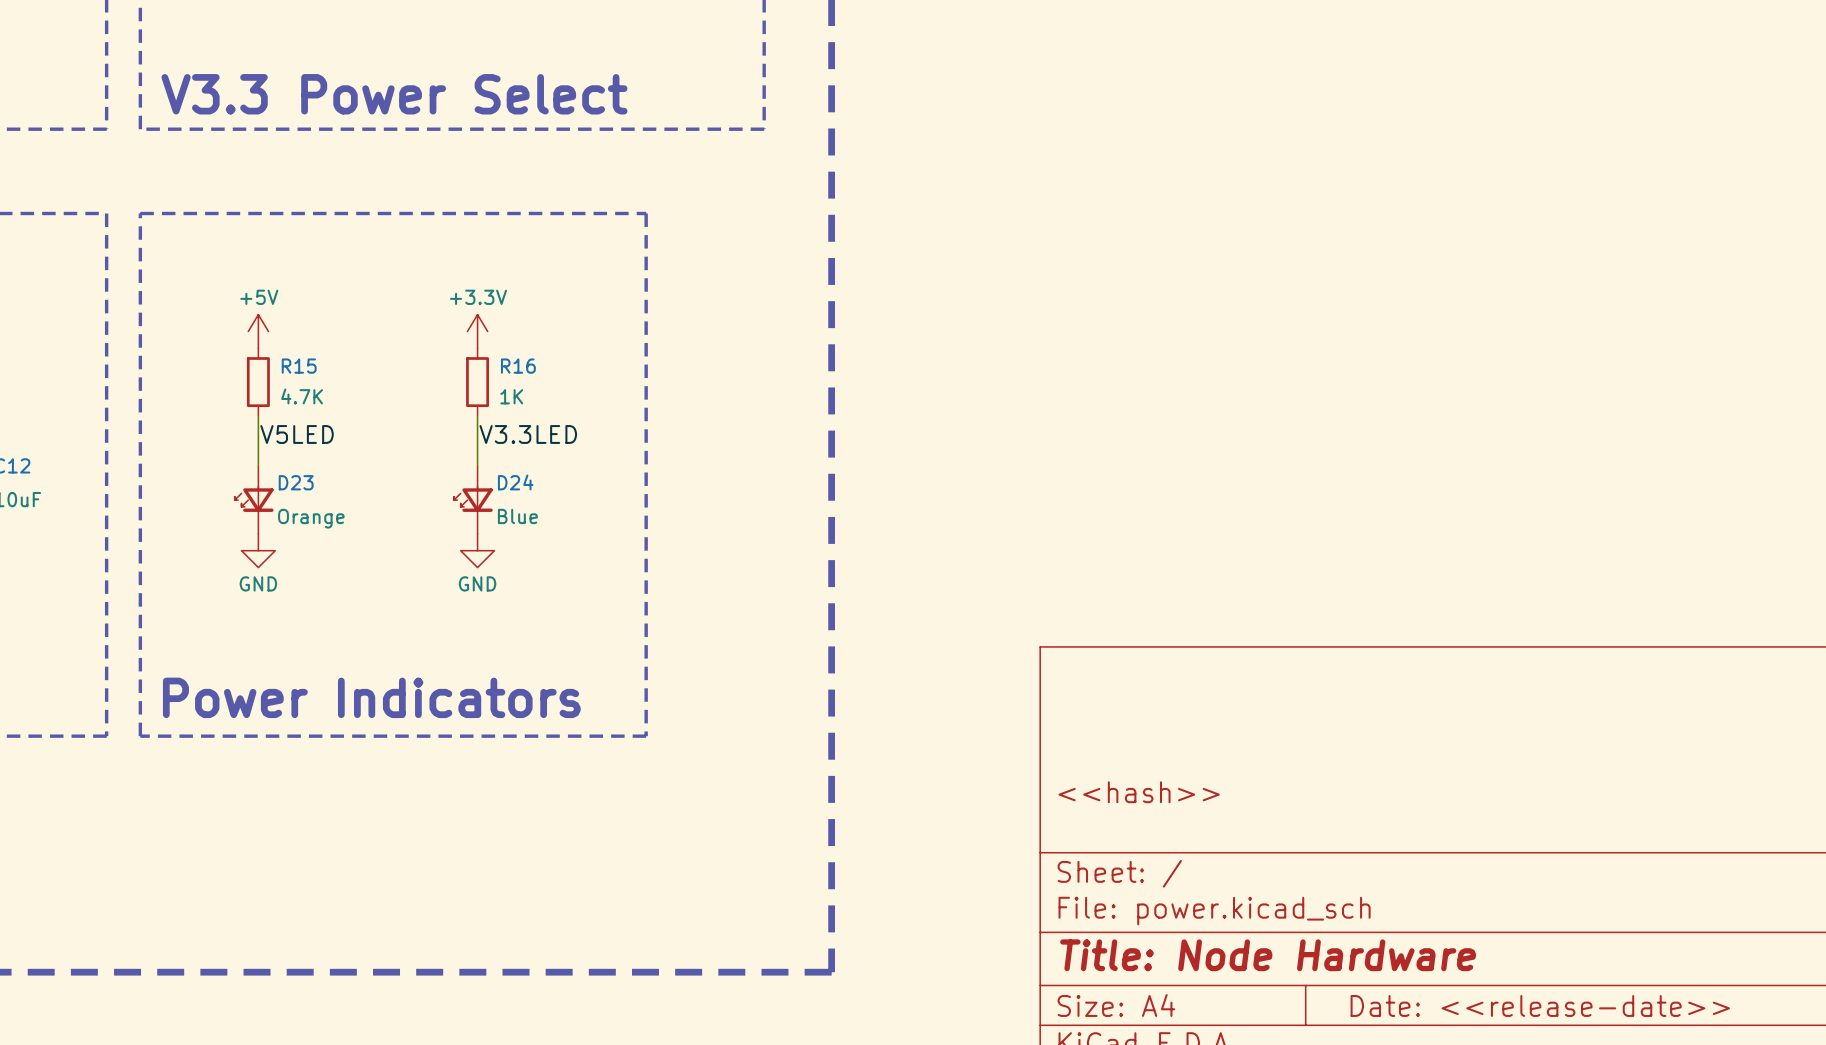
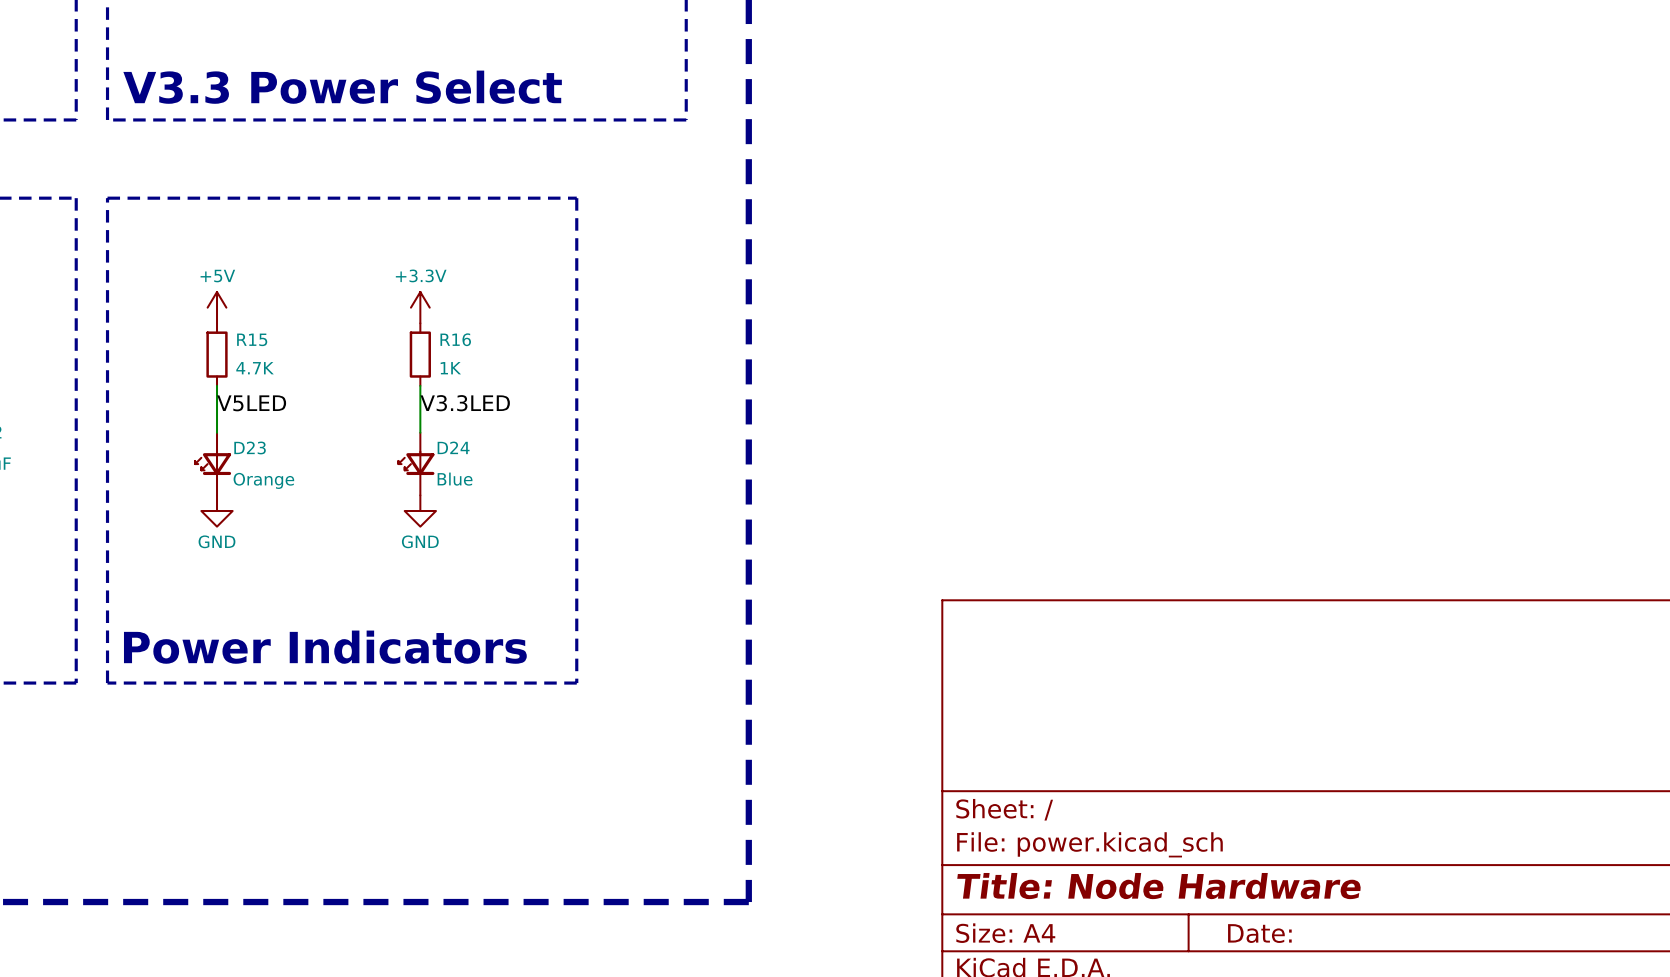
title block: <<hash>> (1139, 792) -> none
title block: Date: <<release-date>> (1540, 1005) -> Date: (1259, 933)

